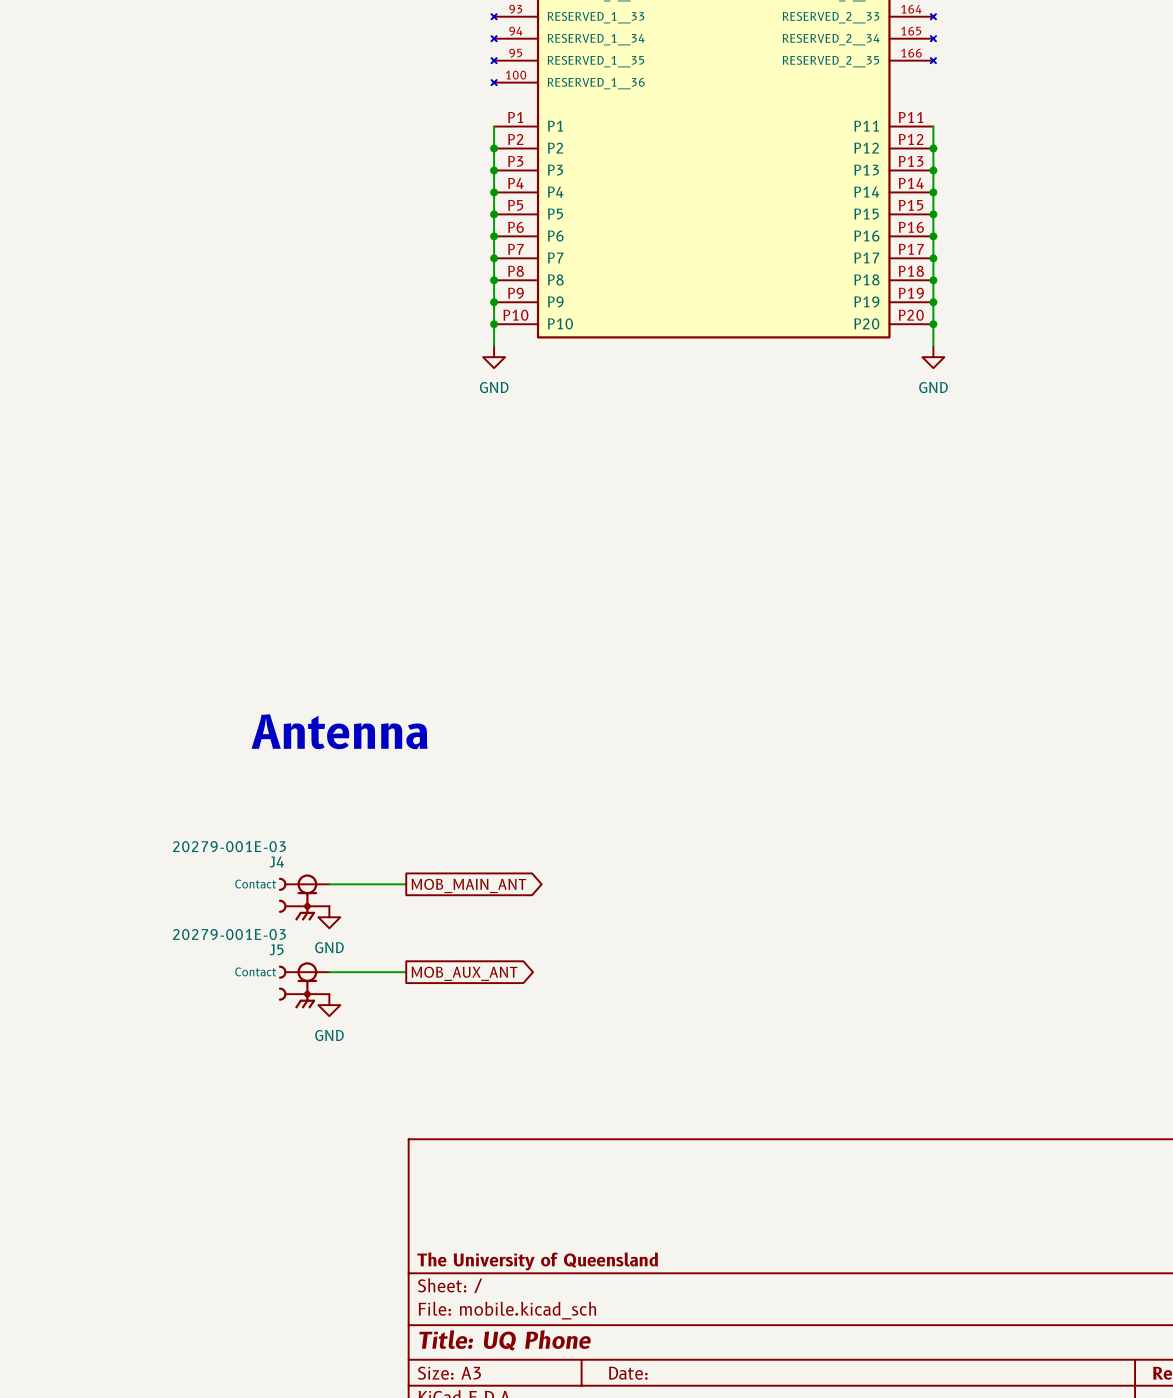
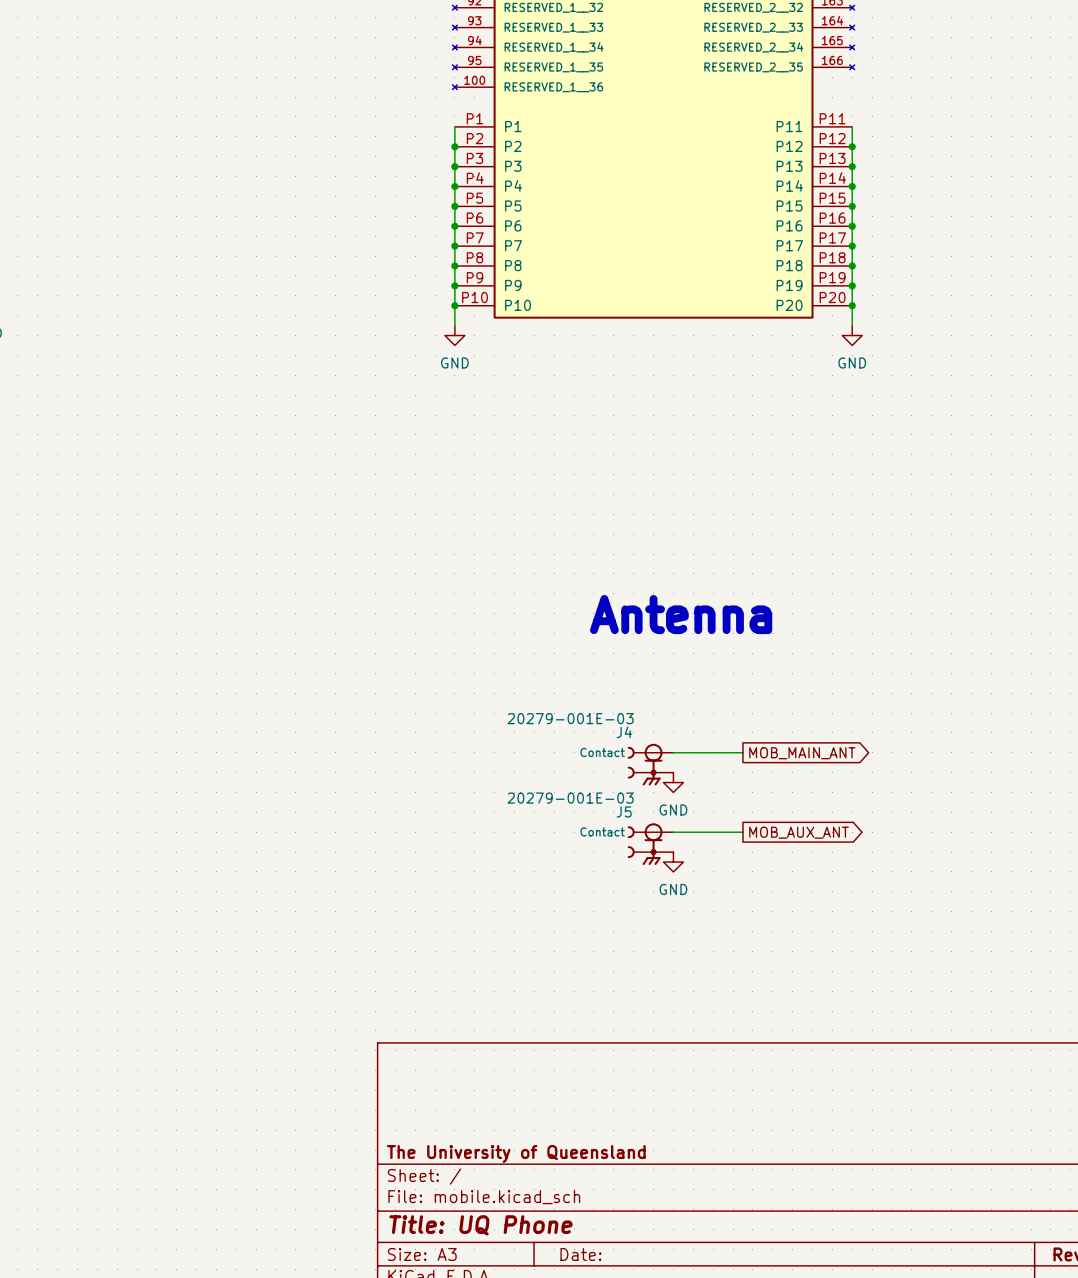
text: none -> Antenna (681, 614)
text: Antenna (339, 731) -> none
wire: none -> (673, 752) (742, 752)
global label: none -> MOB_MAIN_ANT (802, 753)
power symbol: none -> GND (673, 782)
wire: (329, 884) (406, 884) -> none
global label: MOB_MAIN_ANT (468, 885) -> none
J4 position: (304, 897) -> (650, 764)
wire: none -> (673, 832) (742, 832)
global label: none -> MOB_AUX_ANT (799, 832)
power symbol: GND (329, 917) -> none
power symbol: none -> GND (673, 862)
wire: (329, 972) (406, 972) -> none
global label: MOB_AUX_ANT (464, 973) -> none
J5 position: (304, 985) -> (650, 844)
power symbol: GND (329, 1005) -> none

